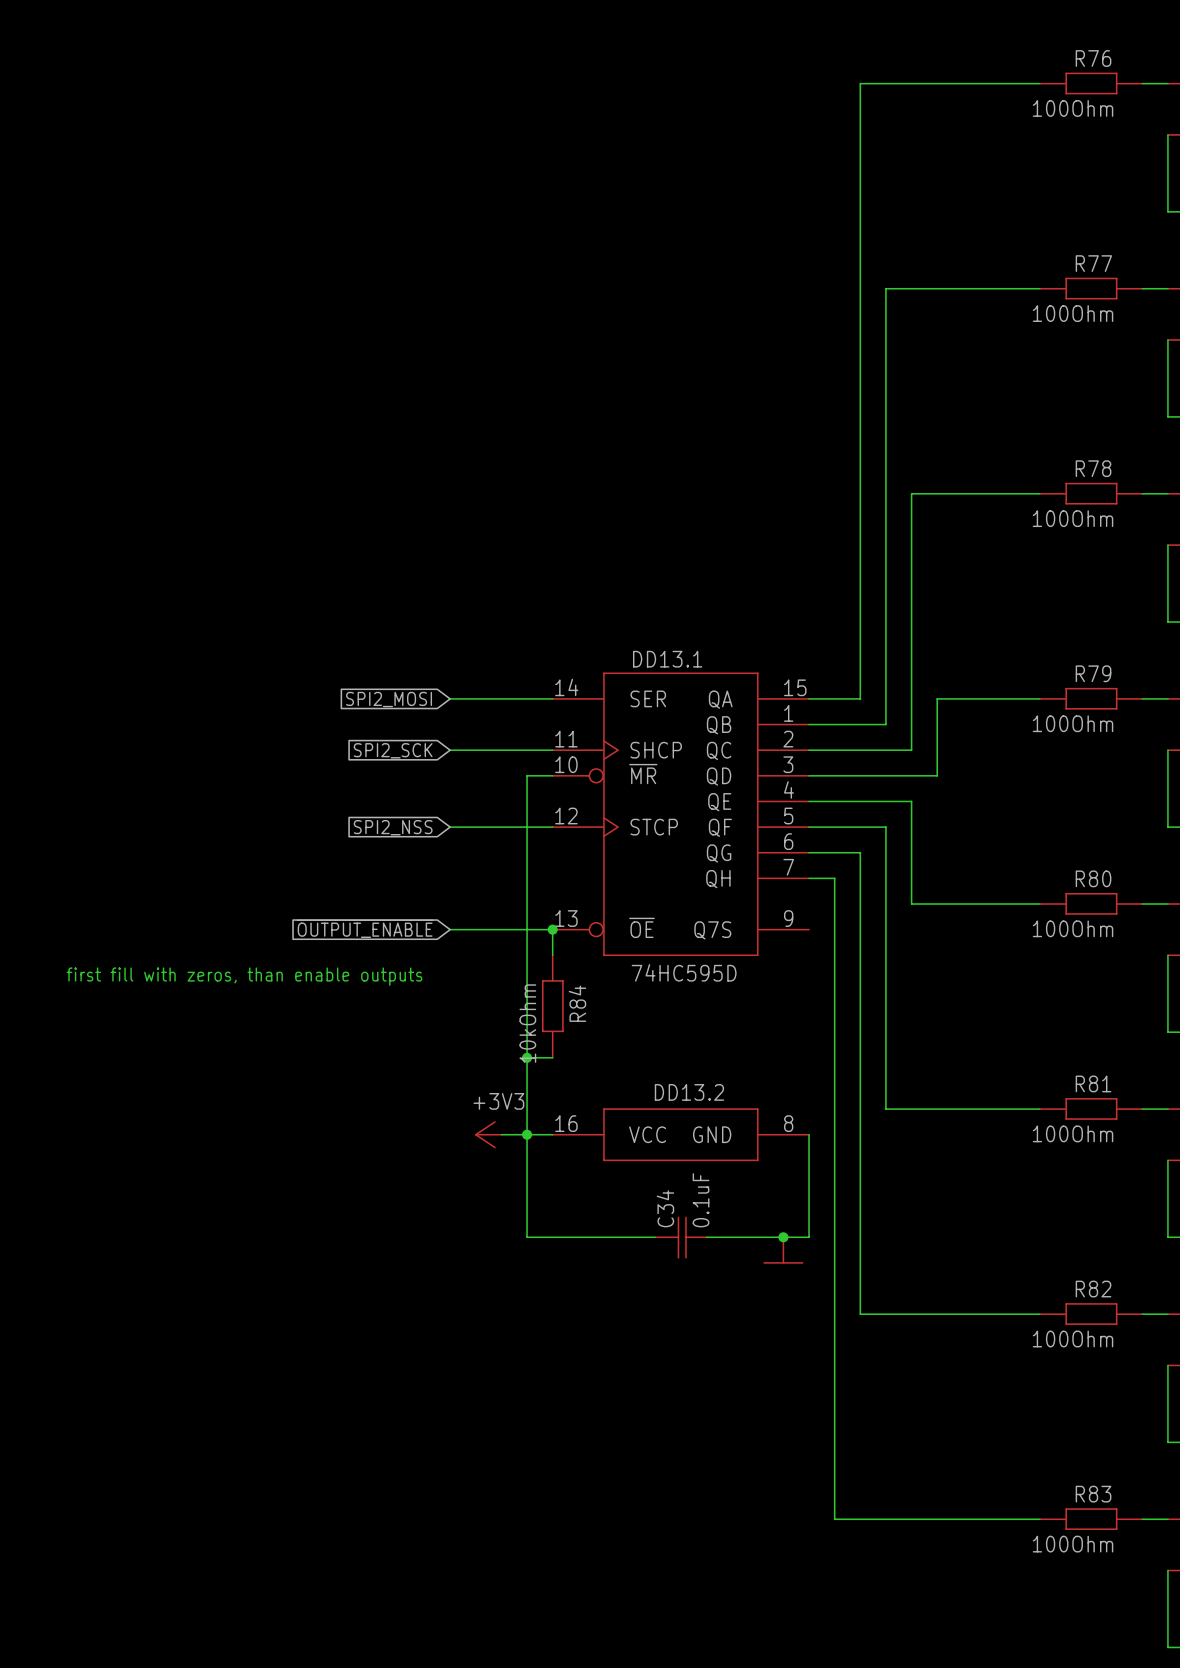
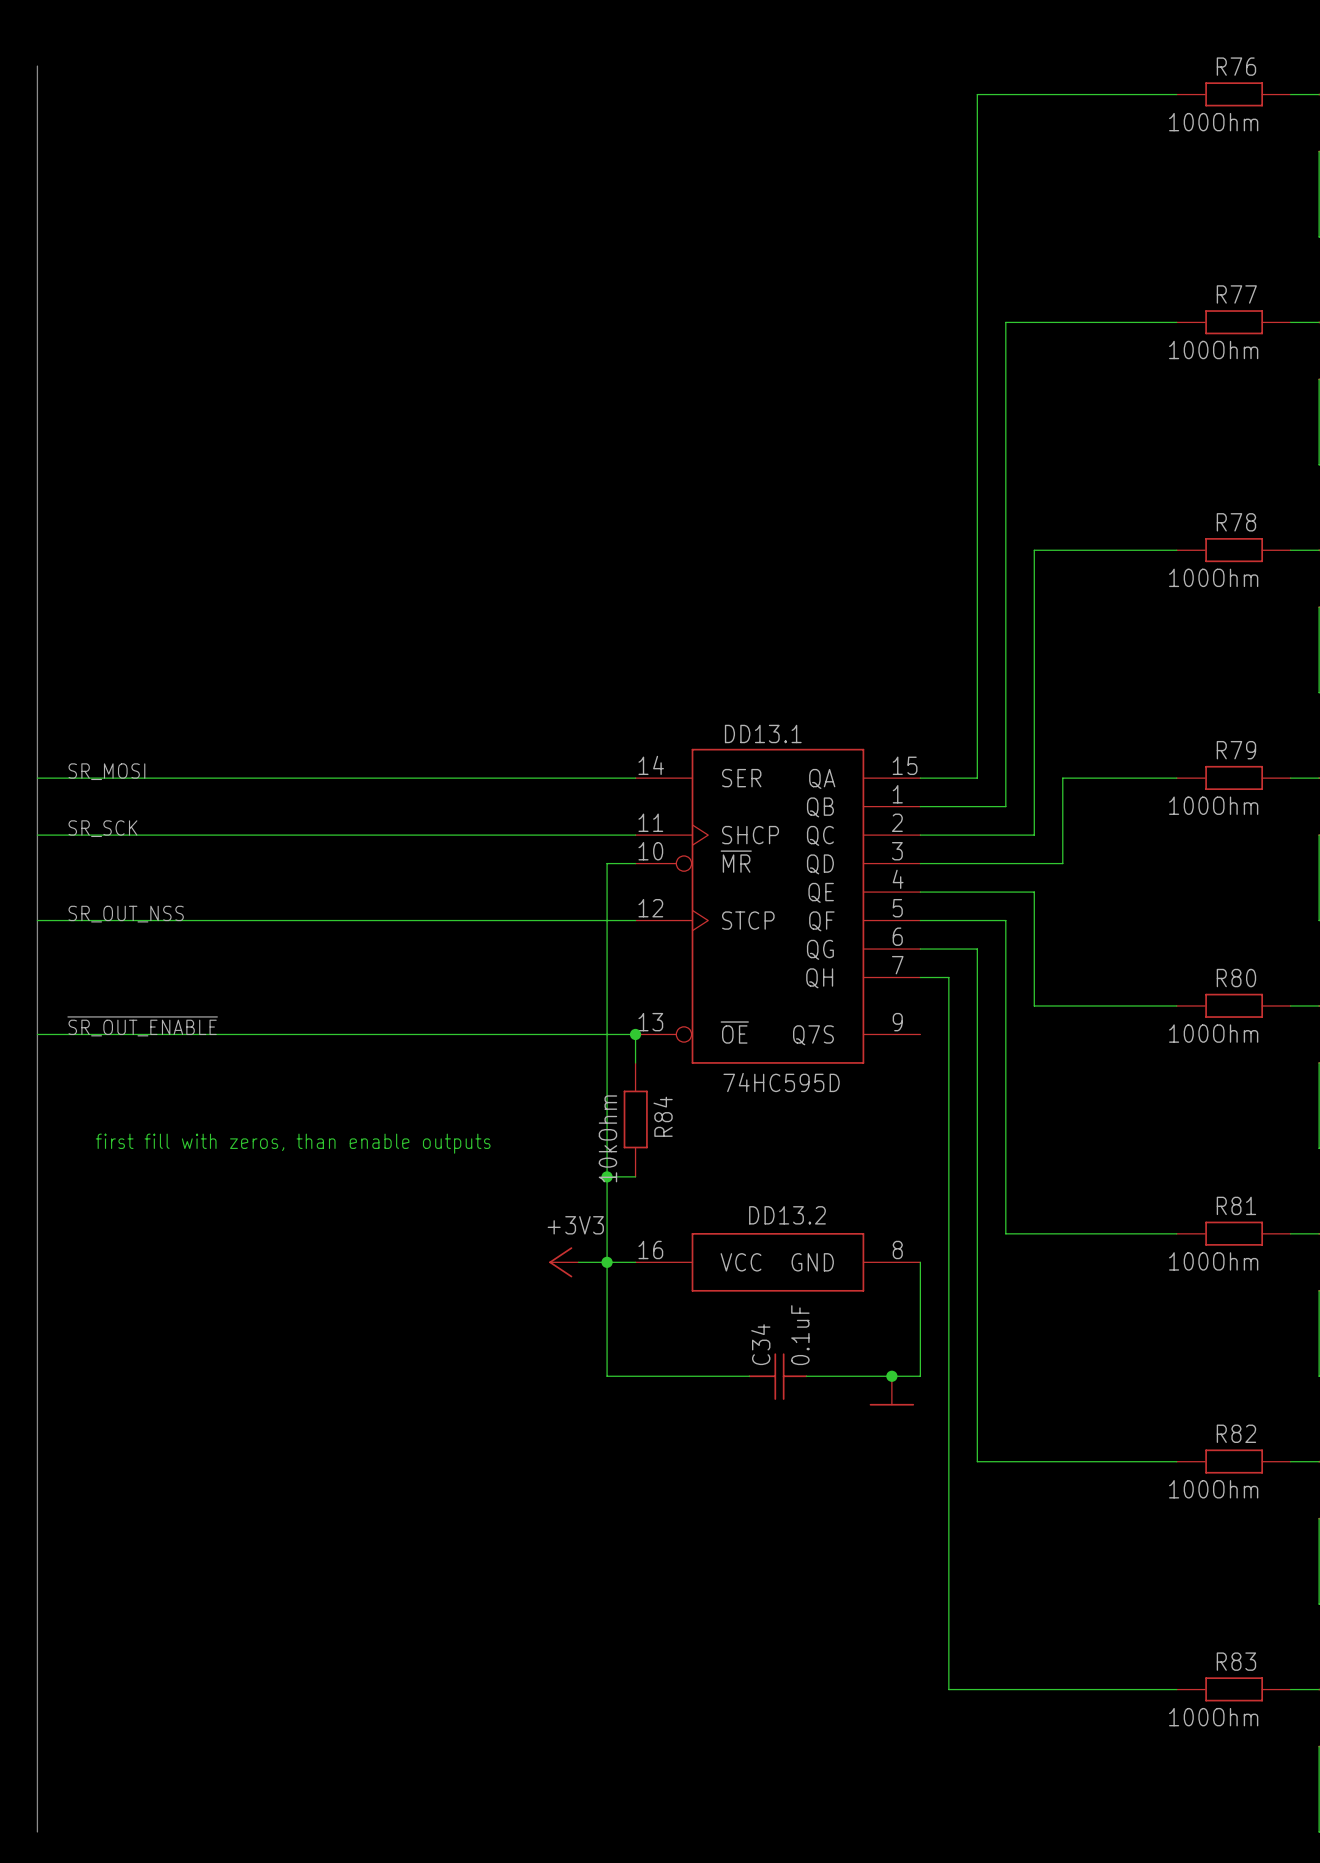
bus: none -> (37, 66) (37, 1831)
label: none -> SR_MOSI (106, 771)
wire: none -> (37, 778) (521, 778)
global label: SPI2_MOSI (389, 699) -> none
label: none -> SR_SCK (102, 828)
wire: none -> (37, 835) (521, 835)
global label: SPI2_SCK (393, 750) -> none
label: none -> SR_OUT_NSS (126, 914)
wire: none -> (37, 920) (521, 920)
global label: SPI2_NSS (393, 827) -> none
label: none -> ~{SR_OUT_ENABLE} (142, 1026)
global label: ~{OUTPUT_ENABLE} (365, 928) -> none
wire: none -> (37, 1034) (521, 1034)
text position: first fill with zeros, than enable outputs (244, 976) -> first fill with zeros, than enable outputs (293, 1143)

